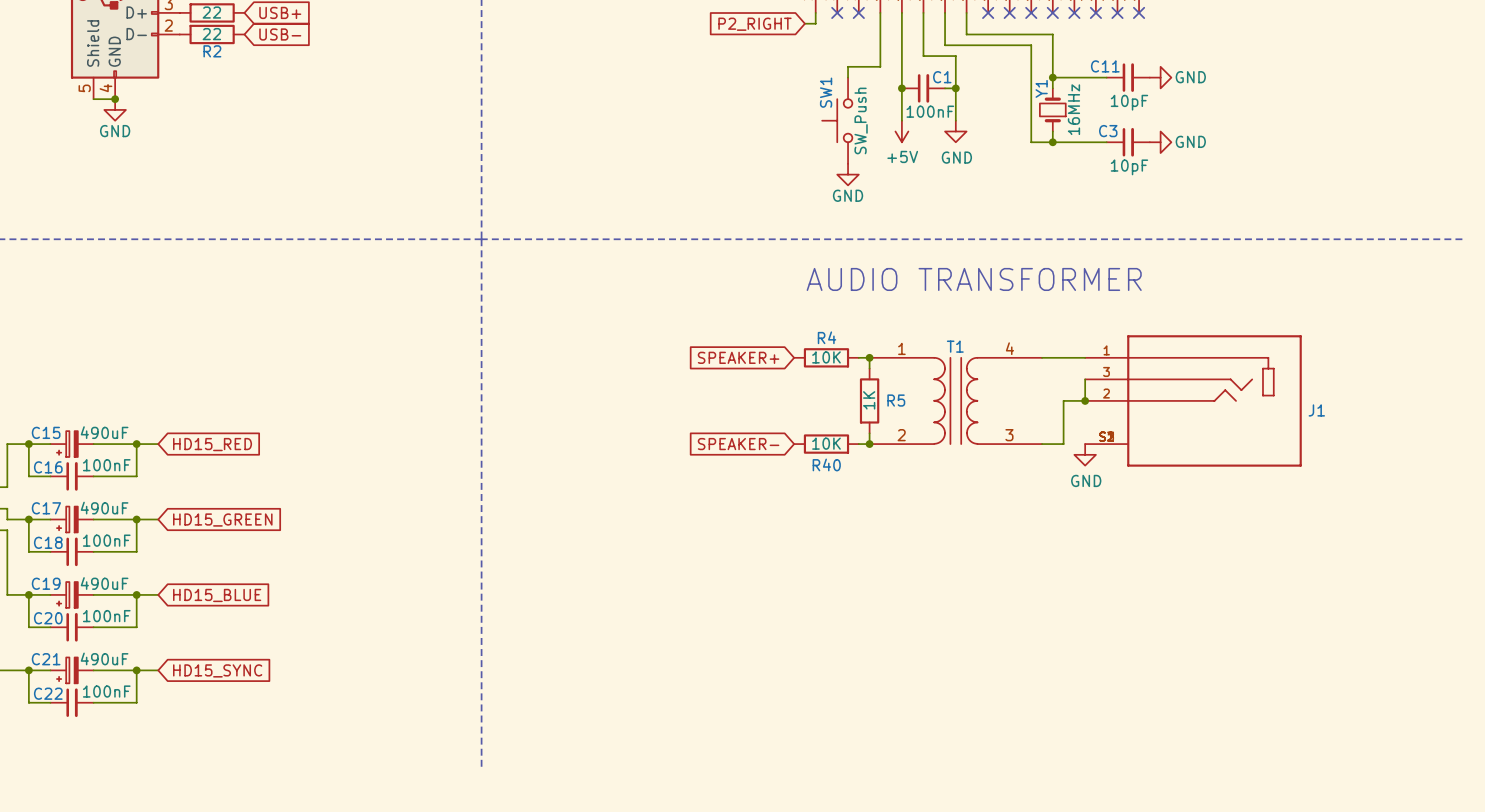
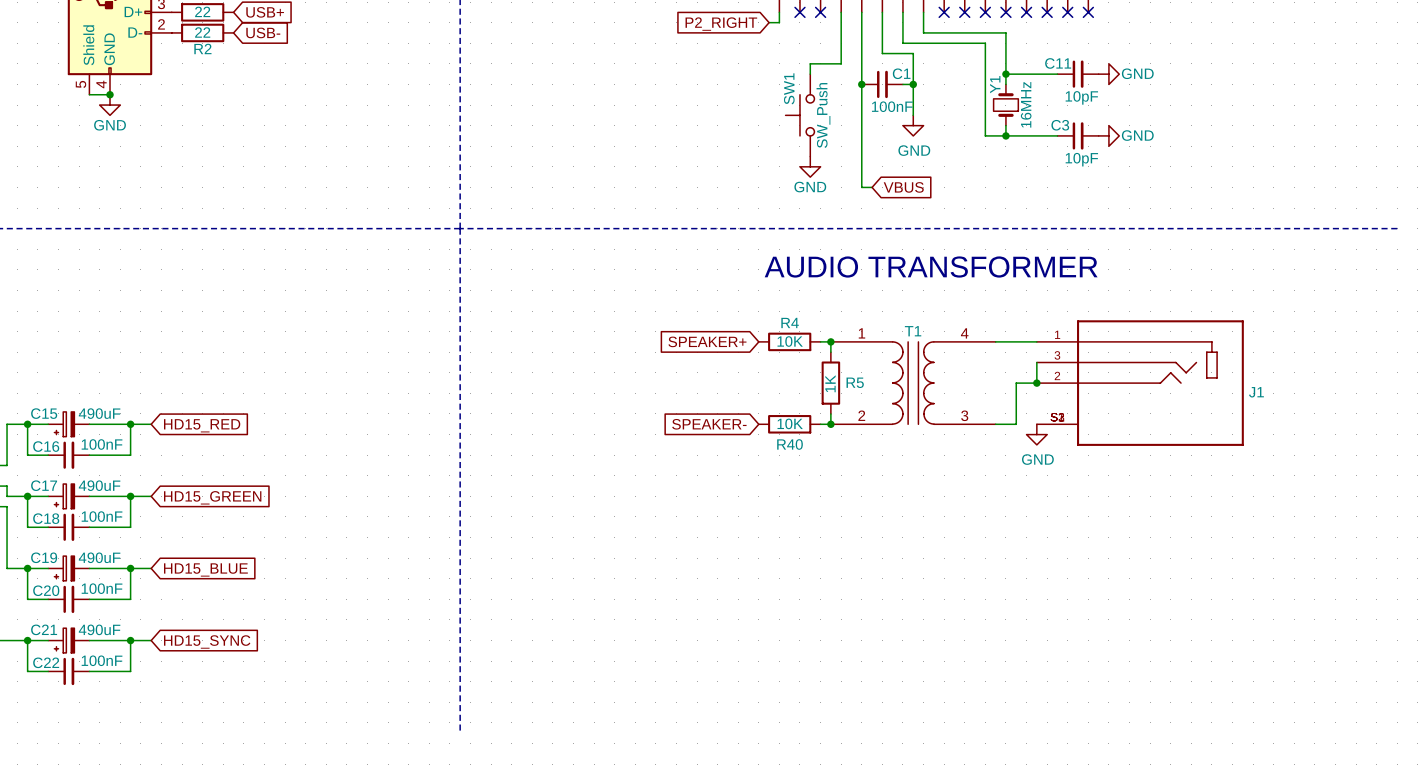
wire: none -> (861, 115) (861, 187) (872, 187)
power symbol: +5V (901, 131) -> none
global label: none -> VBUS (903, 187)

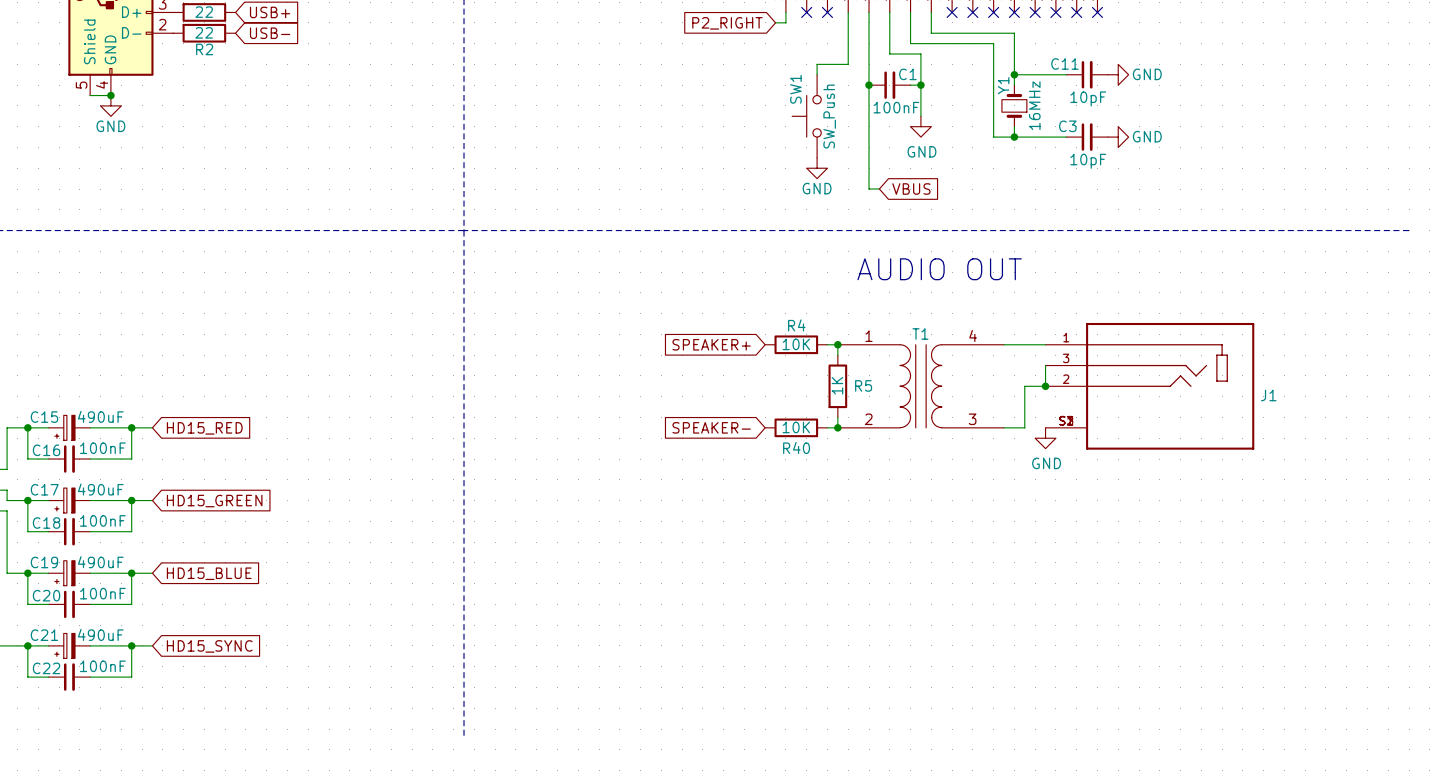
text: AUDIO TRANSFORMER (931, 267) -> AUDIO OUT (939, 269)

